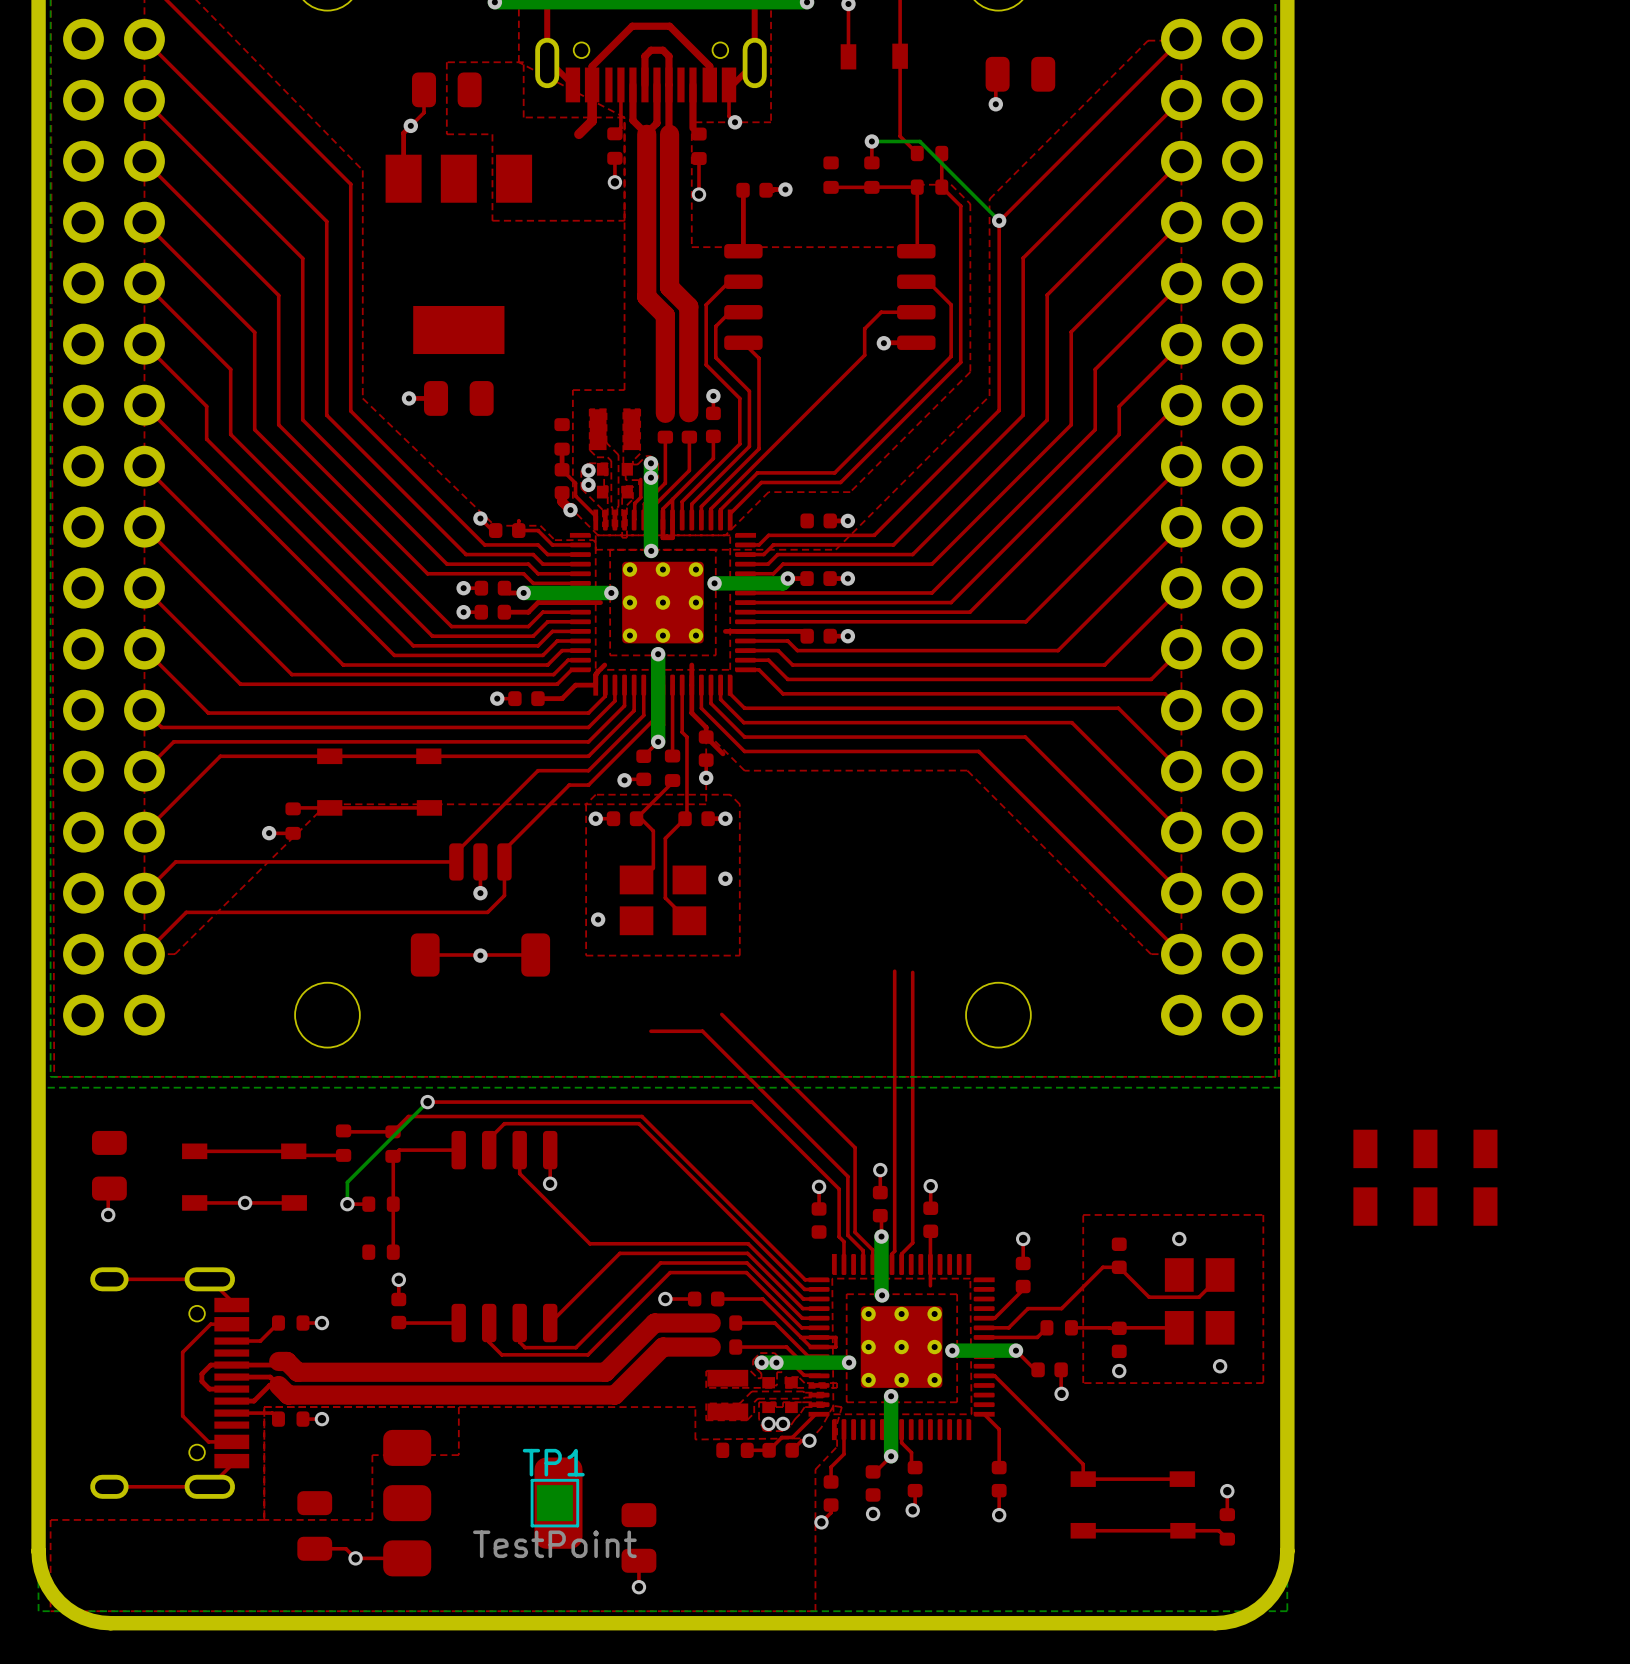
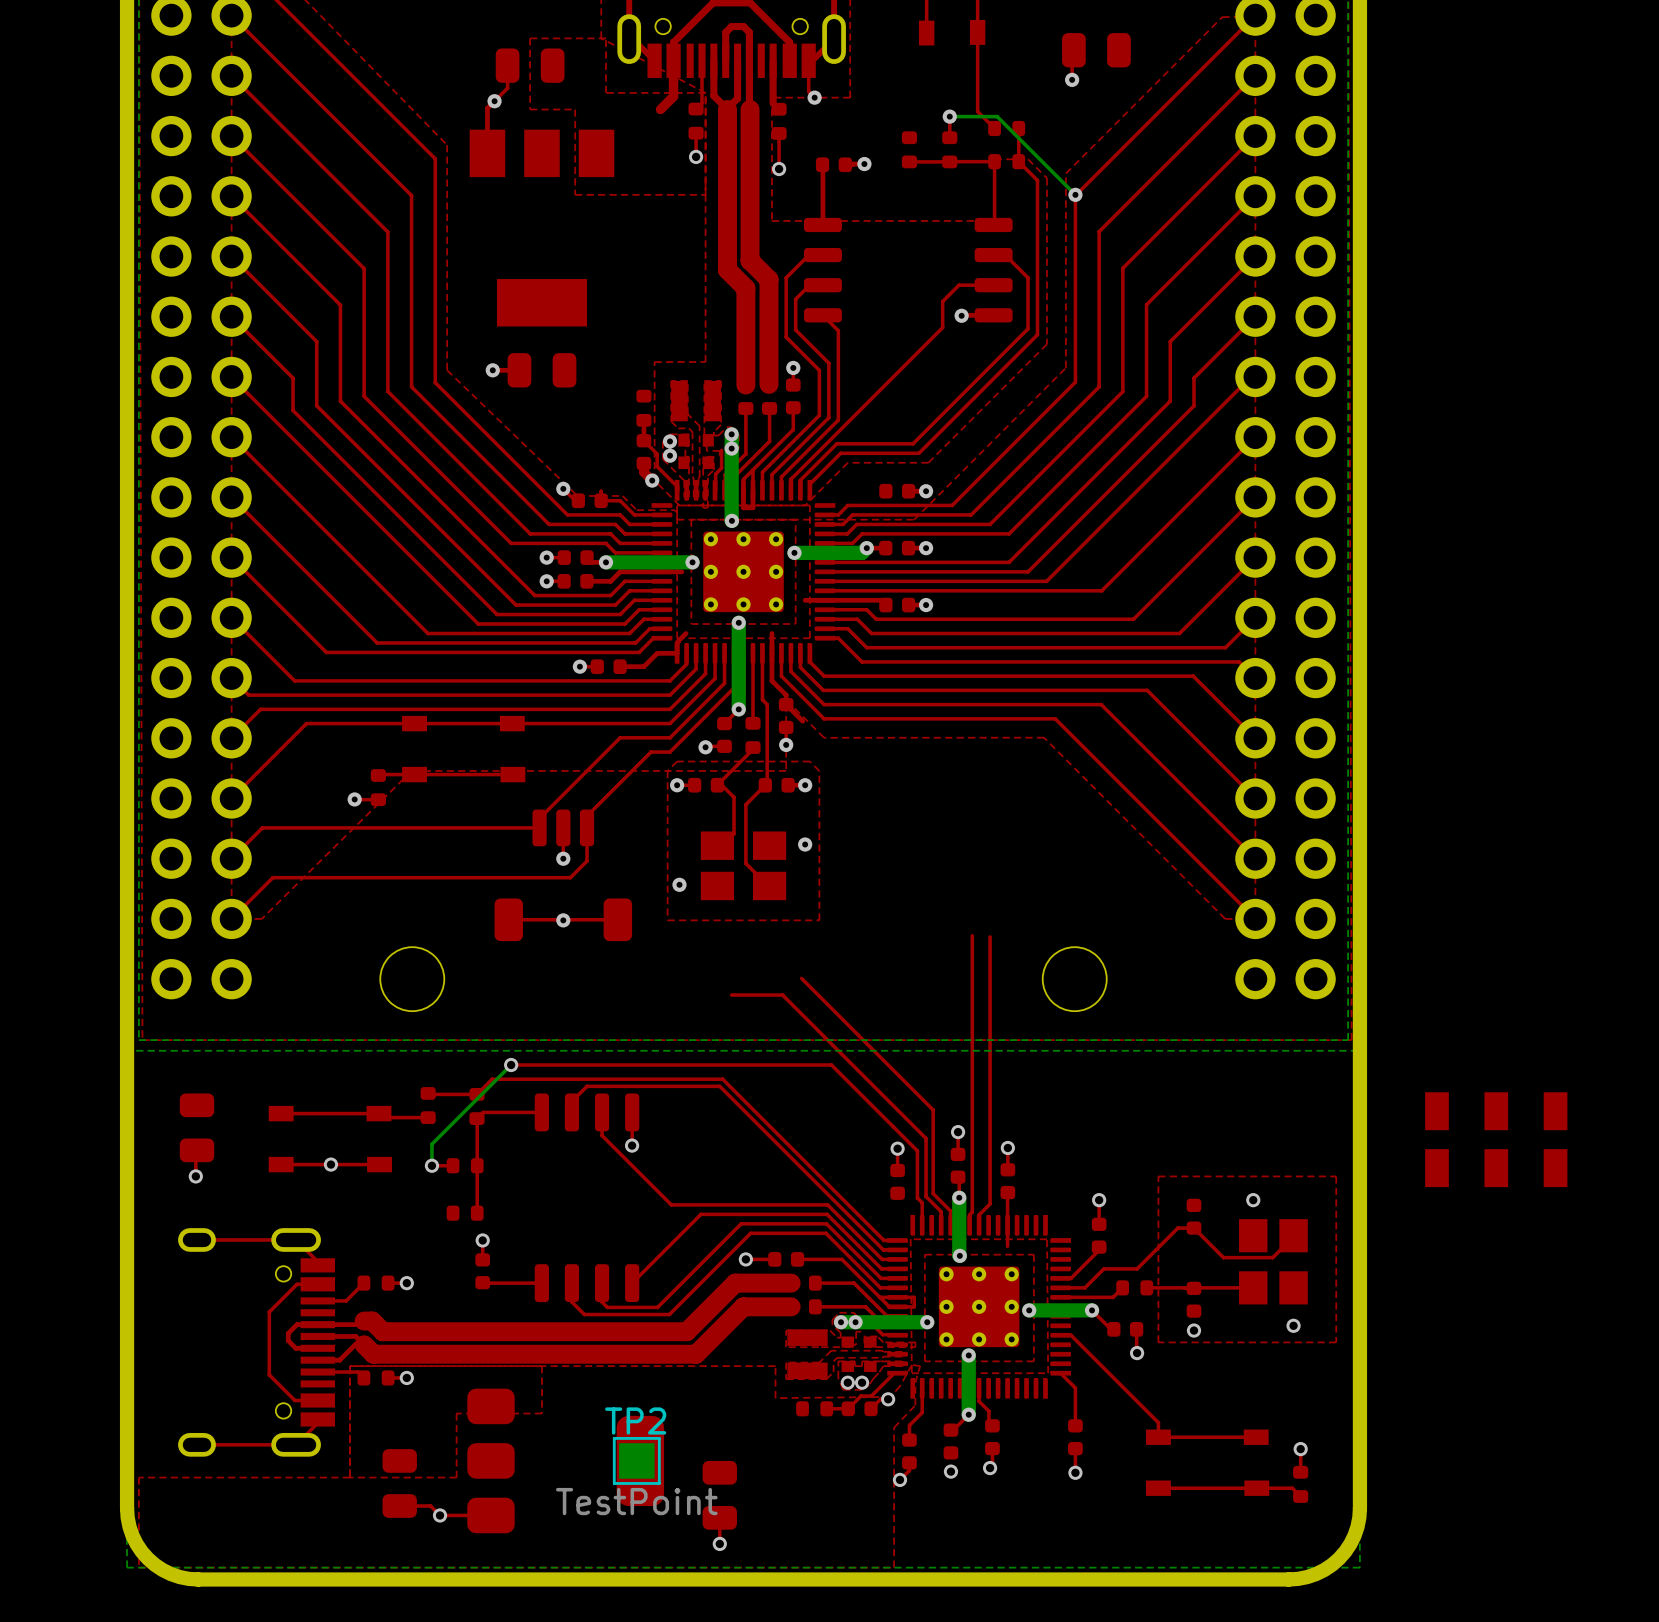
TP1 name: TP1 (553, 1462) -> TP2 (635, 1420)

